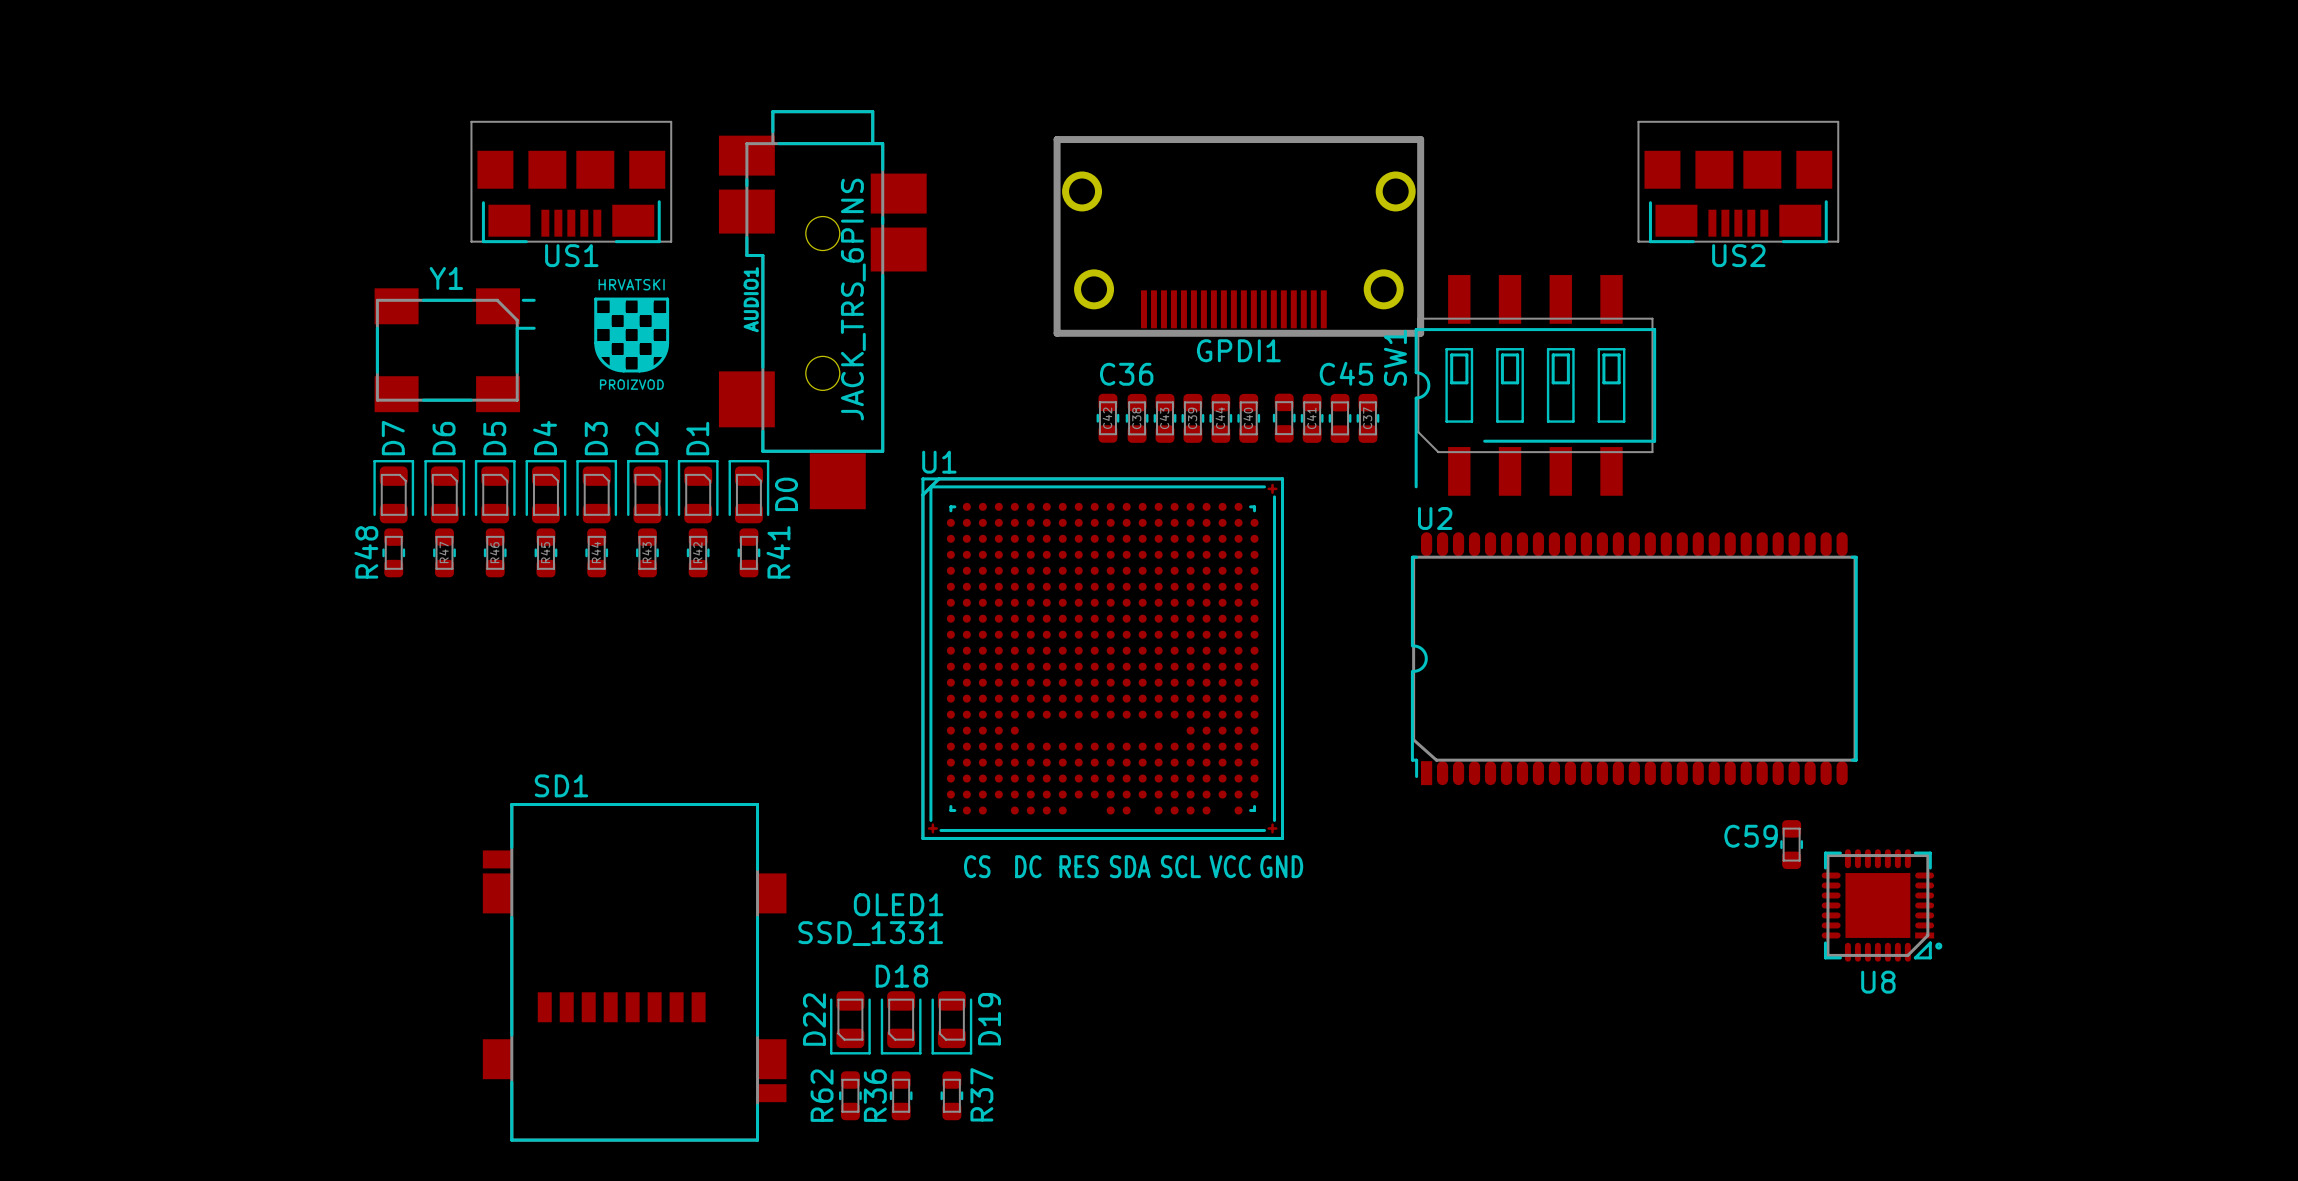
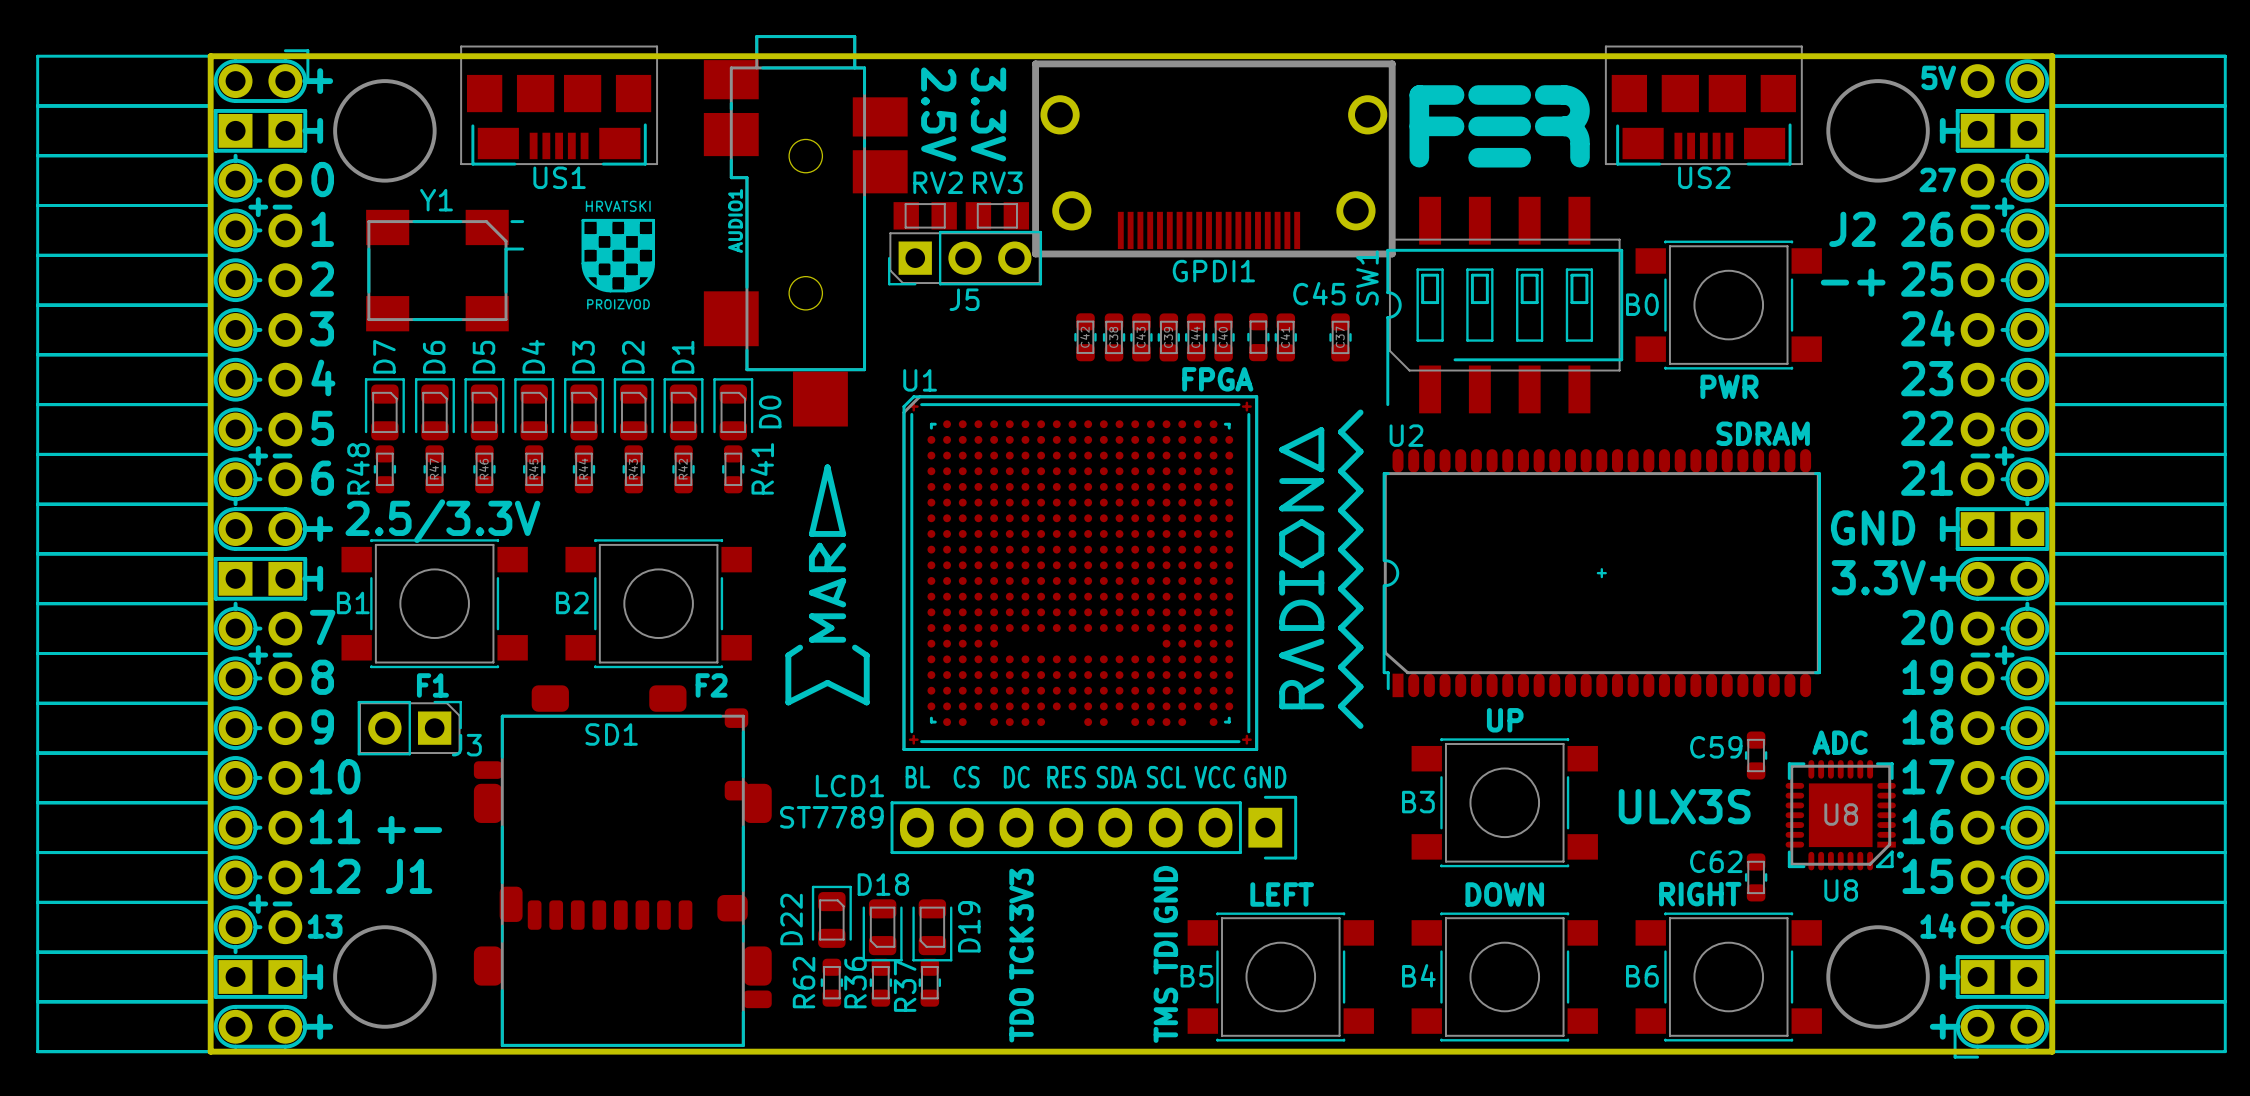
board edge: none -> (210, 56) (210, 1051) (2052, 1051) (2052, 56) (210, 56)
drawing: none -> [2005, 59, 2050, 103]
line: none -> (235, 61) (292, 62) (299, 67) (303, 73) (305, 81) (303, 88) (297, 96) (287, 100) (227, 99) (218, 91) (215, 78) (221, 67) (227, 62) (235, 61)
line: none -> (320, 71) (320, 91)
text: none -> 5V (1938, 77)
drawing: none -> [333, 79, 437, 183]
drawing: none -> [1826, 79, 1930, 183]
line: none -> (305, 81) (330, 81)
drawing: none -> [1409, 85, 1590, 168]
line: none -> (215, 110) (215, 150) (305, 150) (305, 110) (215, 110)
line: none -> (1957, 110) (2047, 110) (2047, 150) (1957, 150) (1957, 110)
text: none -> 2.5V (938, 114)
text: none -> 3.3V (988, 114)
line: none -> (320, 120) (320, 140)
line: none -> (1942, 120) (1942, 140)
line: none -> (305, 130) (320, 130)
line: none -> (1942, 130) (1957, 130)
line: none -> (235, 155) (235, 160)
line: none -> (2027, 155) (2027, 160)
drawing: none -> [213, 158, 258, 502]
drawing: none -> [2005, 158, 2050, 502]
text: none -> 0 (322, 179)
text: none -> 27 (1937, 179)
line: none -> (255, 180) (260, 180)
line: none -> (2002, 180) (2007, 180)
text: none -> +- (270, 207)
text: none -> -+ (1992, 207)
RV2: none -> (925, 215)
RV3: none -> (997, 215)
AUDIO1 value: JACK_TRS_6PINS (853, 299) -> none
text: none -> 1 (322, 229)
text: none -> 26 (1927, 229)
line: none -> (255, 230) (260, 230)
line: none -> (2002, 230) (2007, 230)
J5: none -> (965, 258)
text: none -> 2 (321, 279)
text: none -> 25 (1927, 279)
line: none -> (255, 280) (260, 280)
line: none -> (2002, 280) (2007, 280)
text: none -> -+ (1853, 282)
B0: none -> (1728, 305)
text: none -> 24 (1927, 328)
text: none -> 3 (321, 328)
line: none -> (255, 329) (260, 329)
line: none -> (2002, 329) (2007, 329)
C36: (1340, 418) -> none
text: none -> 4 (323, 377)
text: none -> 23 (1927, 378)
line: none -> (255, 379) (260, 379)
text: none -> FPGA (1217, 379)
line: none -> (2002, 379) (2007, 379)
text: none -> PWR (1729, 386)
U1 footprint: [921, 477, 1285, 840] -> [902, 395, 1259, 751]
drawing: none -> [1279, 409, 1364, 729]
text: none -> 5 (322, 428)
text: none -> 22 (1927, 428)
line: none -> (255, 429) (260, 429)
line: none -> (2002, 429) (2007, 429)
text: none -> SDRAM (1763, 433)
U2 footprint: [1410, 532, 1858, 786] -> [1382, 449, 1821, 698]
text: none -> +- (270, 455)
text: none -> -+ (1992, 455)
drawing: none -> [785, 464, 870, 706]
text: none -> 6 (322, 478)
text: none -> 21 (1927, 478)
line: none -> (255, 479) (260, 479)
line: none -> (2002, 479) (2007, 479)
line: none -> (235, 499) (235, 504)
line: none -> (2027, 499) (2027, 504)
line: none -> (235, 509) (292, 510) (299, 514) (303, 521) (305, 529) (303, 536) (297, 544) (287, 548) (227, 547) (218, 539) (215, 526) (221, 514) (227, 510) (235, 509)
line: none -> (1957, 509) (2047, 509) (2047, 548) (1957, 548) (1957, 509)
line: none -> (320, 519) (320, 539)
line: none -> (1942, 519) (1942, 539)
text: none -> 2.5/3.3V (442, 521)
text: none -> GND (1873, 527)
line: none -> (305, 529) (330, 529)
line: none -> (1942, 529) (1957, 529)
J1: none -> (172, 551)
J2: none -> (2090, 556)
line: none -> (215, 558) (305, 558) (305, 598) (215, 598) (215, 558)
line: none -> (1977, 558) (2034, 560) (2041, 564) (2045, 571) (2047, 578) (2045, 586) (2039, 594) (2029, 598) (1969, 597) (1960, 588) (1957, 581) (1958, 573) (1965, 563) (1977, 558)
line: none -> (320, 568) (320, 588)
line: none -> (1942, 568) (1942, 588)
text: none -> 3.3V (1878, 577)
line: none -> (305, 578) (320, 578)
line: none -> (1932, 578) (1957, 578)
line: none -> (235, 603) (235, 608)
B1: none -> (434, 603)
B2: none -> (658, 603)
line: none -> (2027, 603) (2027, 608)
drawing: none -> [213, 606, 258, 950]
drawing: none -> [2005, 606, 2050, 950]
text: none -> 7 (322, 627)
text: none -> 20 (1927, 627)
line: none -> (255, 628) (260, 628)
line: none -> (2002, 628) (2007, 628)
text: none -> +- (270, 655)
text: none -> -+ (1992, 655)
text: none -> 8 (322, 677)
text: none -> 19 (1927, 677)
line: none -> (255, 678) (260, 678)
line: none -> (2002, 678) (2007, 678)
text: none -> F1 (432, 685)
text: none -> F2 (711, 685)
SD1 name position: SD1 (561, 785) -> SD1 (611, 734)
SD1 footprint: [482, 803, 787, 1142] -> [473, 685, 772, 1047]
text: none -> UP (1505, 720)
text: none -> 9 (322, 727)
text: none -> 18 (1927, 727)
line: none -> (255, 728) (260, 728)
J3: none -> (409, 728)
line: none -> (2002, 728) (2007, 728)
text: none -> ADC (1840, 742)
text: none -> 10 (335, 776)
text: none -> 17 (1928, 776)
line: none -> (255, 777) (260, 777)
line: none -> (2002, 777) (2007, 777)
B3: none -> (1504, 802)
text: none -> ULX3S (1684, 806)
OLED1: SSD_1331 (1050, 900) -> none
text: none -> U8 (1841, 814)
text: none -> 11 (335, 826)
text: none -> 16 (1927, 826)
line: none -> (255, 827) (260, 827)
LCD1: none -> ST7789 (1093, 827)
line: none -> (2002, 827) (2007, 827)
text: none -> +- (409, 830)
text: none -> 12 (335, 876)
text: none -> 15 (1927, 876)
line: none -> (255, 877) (260, 877)
C62: none -> (1756, 877)
line: none -> (2002, 877) (2007, 877)
text: none -> RIGHT (1700, 894)
text: none -> 3V3 (1021, 894)
text: none -> GND (1165, 894)
text: none -> LEFT (1282, 894)
text: none -> DOWN (1504, 894)
text: none -> +- (270, 903)
text: none -> -+ (1992, 903)
drawing: none -> [333, 925, 437, 1029]
drawing: none -> [1826, 925, 1930, 1029]
text: none -> 13 (325, 926)
text: none -> 14 (1938, 926)
line: none -> (255, 927) (260, 927)
line: none -> (2002, 927) (2007, 927)
D22 rotation: 0° (850, 1022) -> 180° (831, 916)
line: none -> (235, 947) (235, 952)
text: none -> TCK (1021, 953)
text: none -> TDI (1165, 953)
line: none -> (215, 957) (215, 996) (305, 996) (305, 957) (215, 957)
line: none -> (1957, 957) (2047, 957) (2047, 996) (1957, 996) (1957, 957)
line: none -> (320, 967) (320, 986)
line: none -> (1942, 967) (1942, 986)
line: none -> (305, 976) (320, 976)
B5: none -> (1280, 976)
B4: none -> (1504, 976)
B6: none -> (1728, 976)
line: none -> (1942, 976) (1957, 976)
R37 name position: R37 (981, 1094) -> R37 (905, 985)
R62 position: (850, 1095) -> (831, 982)
R36 position: (901, 1095) -> (880, 982)
R37 position: (951, 1095) -> (929, 982)
line: none -> (235, 1006) (292, 1008) (299, 1012) (303, 1019) (305, 1026) (303, 1034) (297, 1042) (287, 1046) (227, 1045) (218, 1036) (215, 1024) (218, 1016) (223, 1010) (235, 1006)
line: none -> (1977, 1006) (2034, 1008) (2041, 1012) (2045, 1019) (2047, 1026) (2045, 1034) (2039, 1042) (2029, 1046) (1969, 1045) (1960, 1036) (1957, 1029) (1958, 1021) (1965, 1010) (1977, 1006)
text: none -> TDO (1021, 1015)
text: none -> TMS (1165, 1015)
line: none -> (320, 1016) (320, 1036)
line: none -> (1942, 1016) (1942, 1036)
line: none -> (305, 1026) (330, 1026)
line: none -> (1932, 1026) (1957, 1026)

